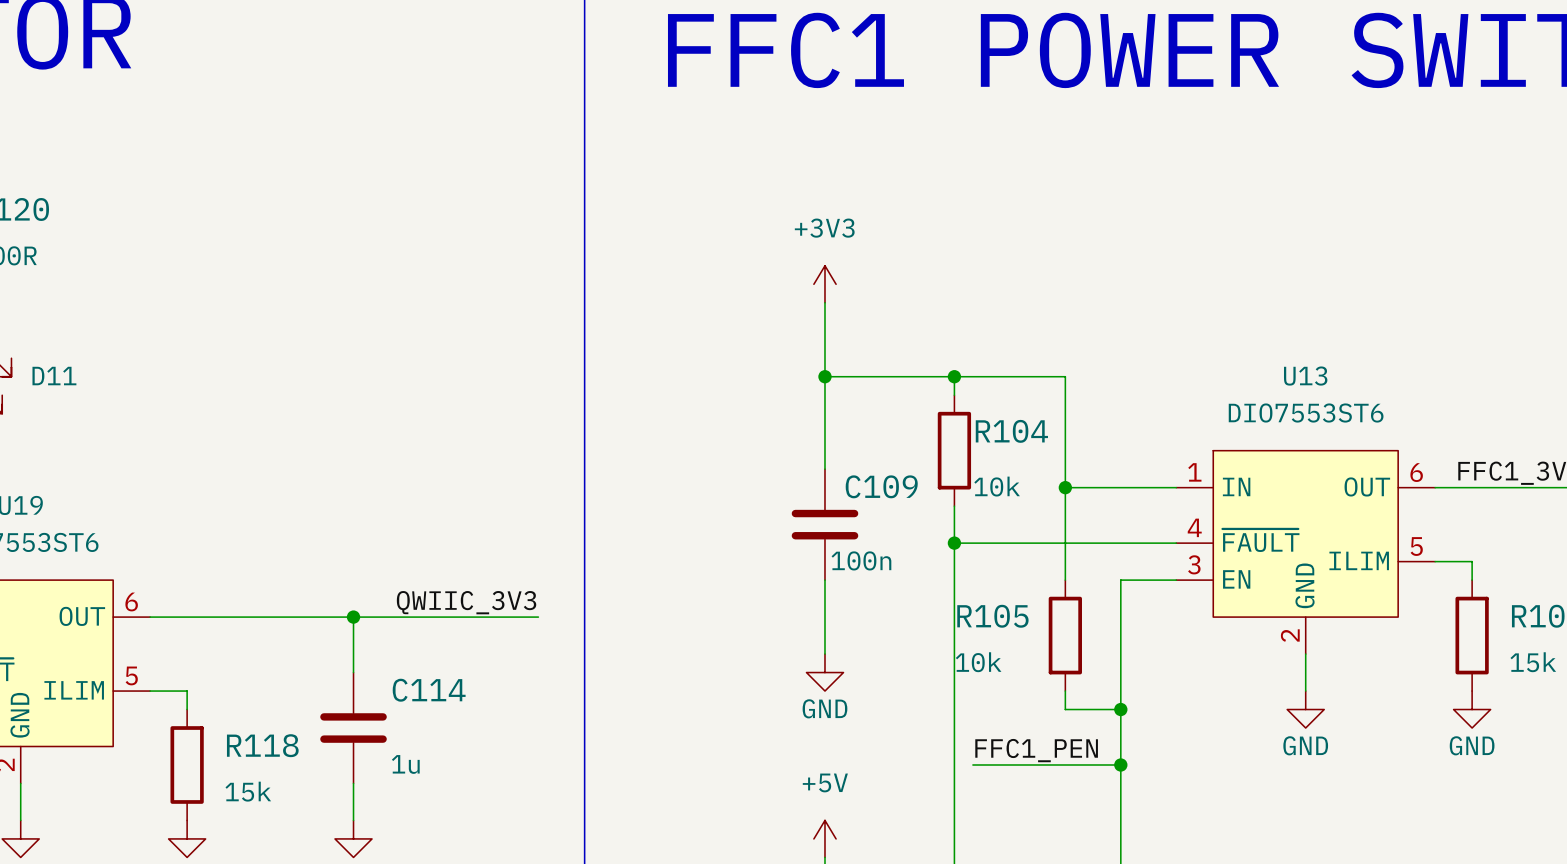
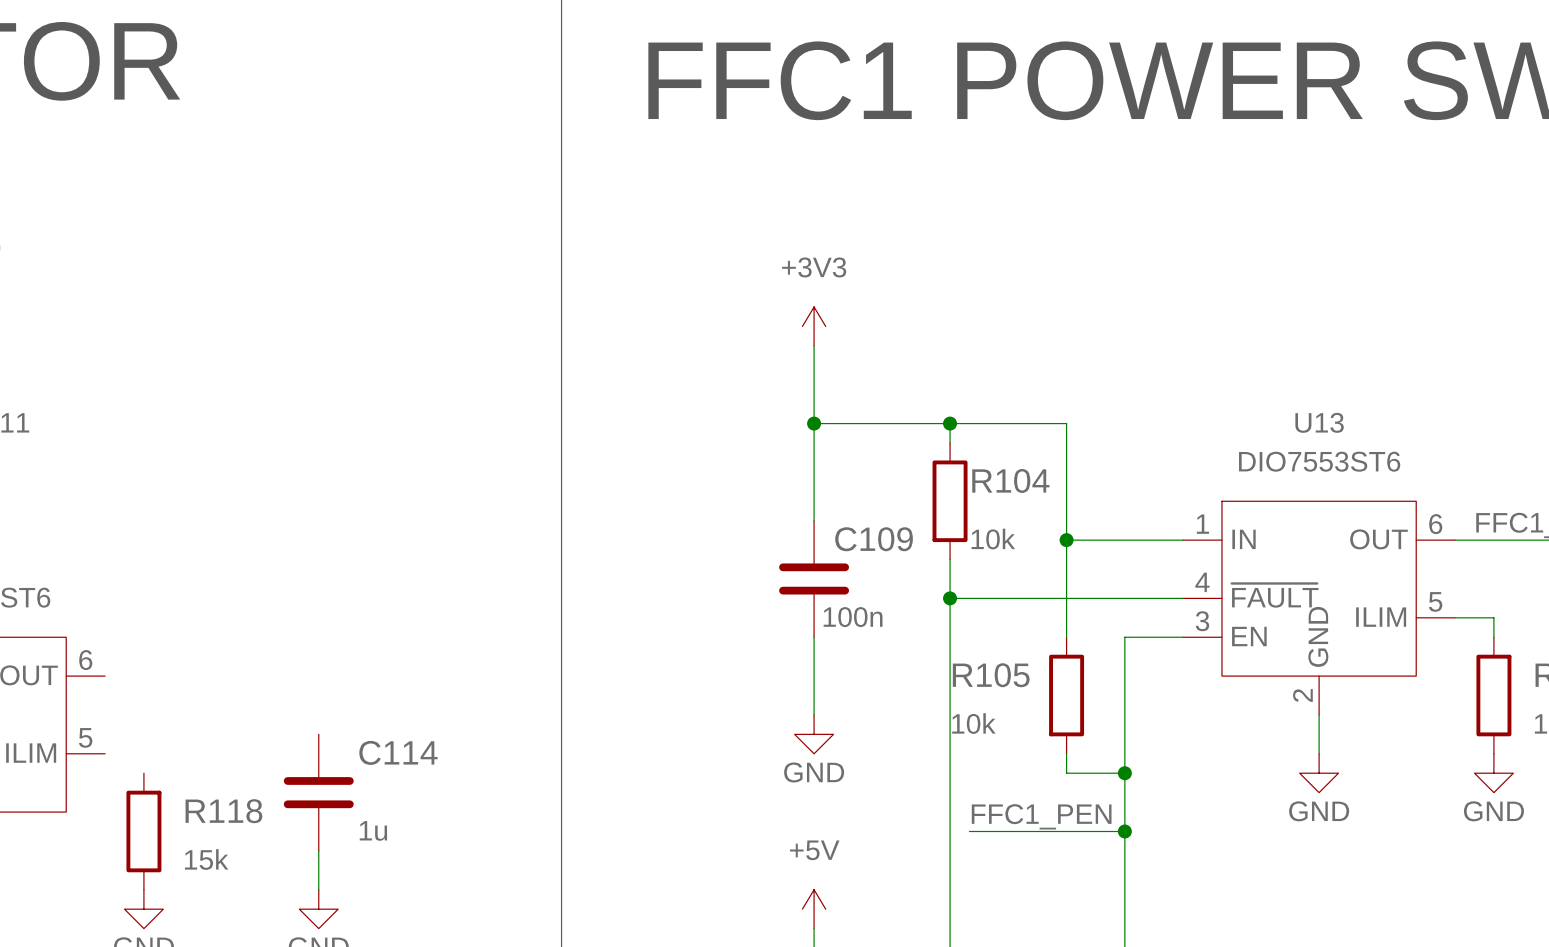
label: QWIIC_3V3 (466, 602) -> none
wire: (150, 617) (538, 617) -> none
wire: (353, 617) (353, 672) -> none
junction: (353, 617) -> none
wire: (150, 691) (187, 691) (187, 709) -> none

